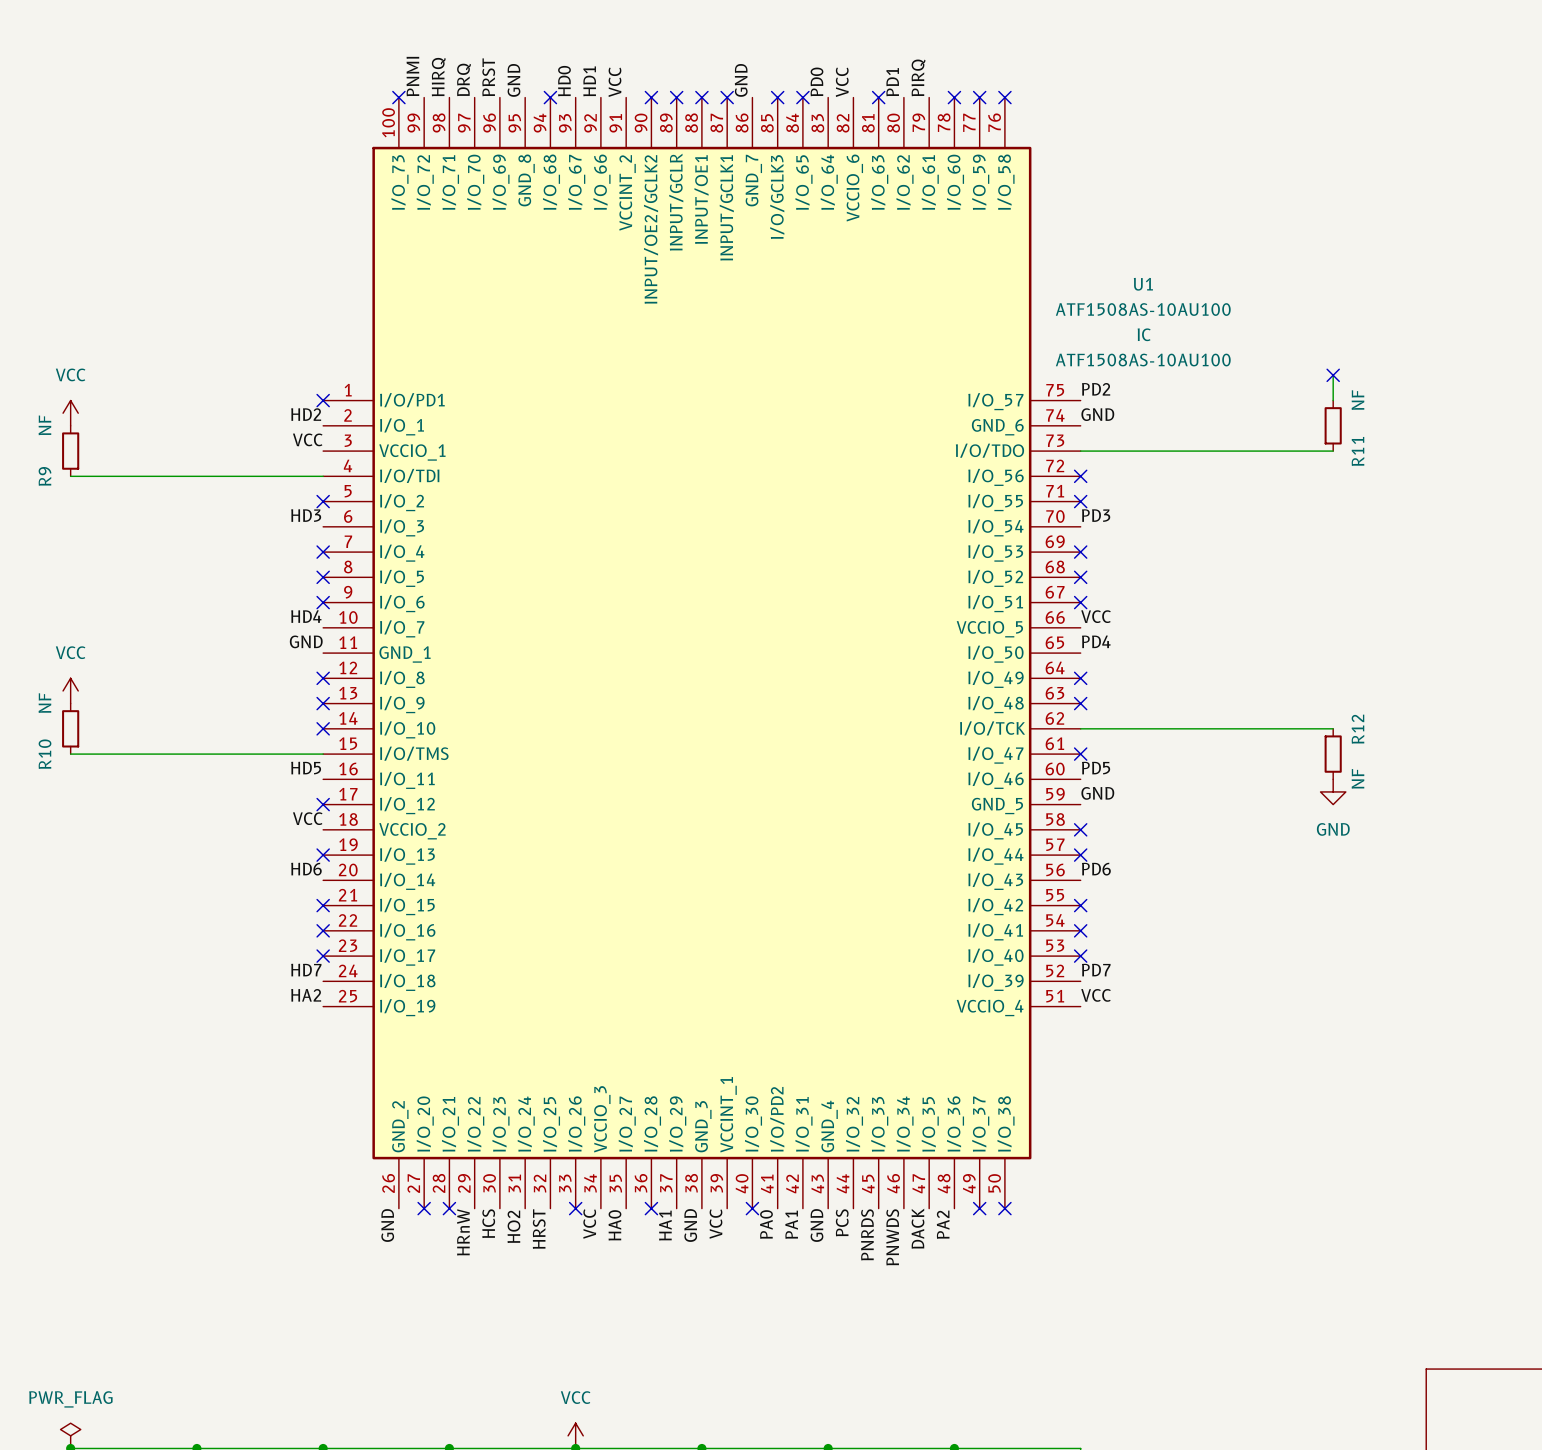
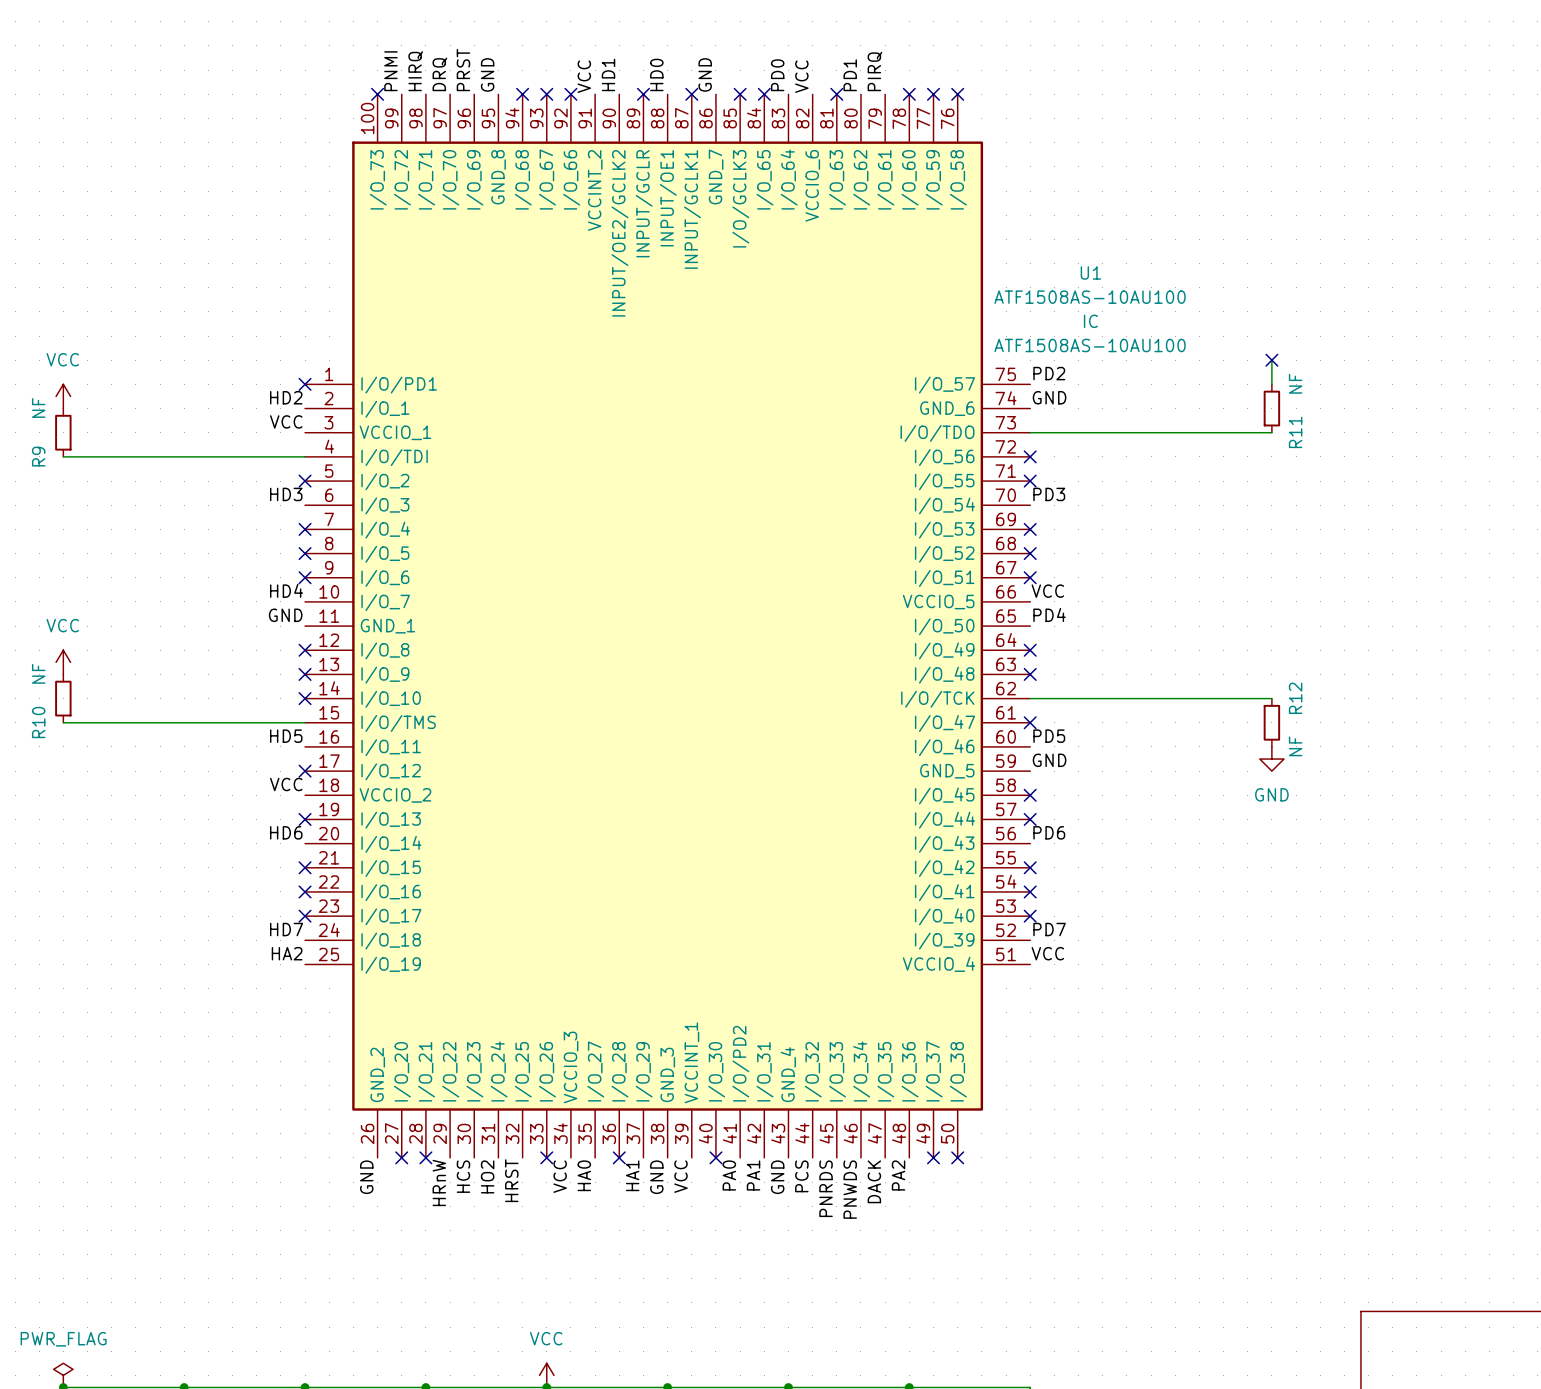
label position: HD0 (564, 81) -> HD0 (656, 74)
label position: HD1 (589, 81) -> HD1 (608, 74)
no-connect mark: none -> (546, 94)
no-connect mark: none -> (570, 94)
no-connect mark: (651, 97) -> none
no-connect mark: (701, 97) -> none

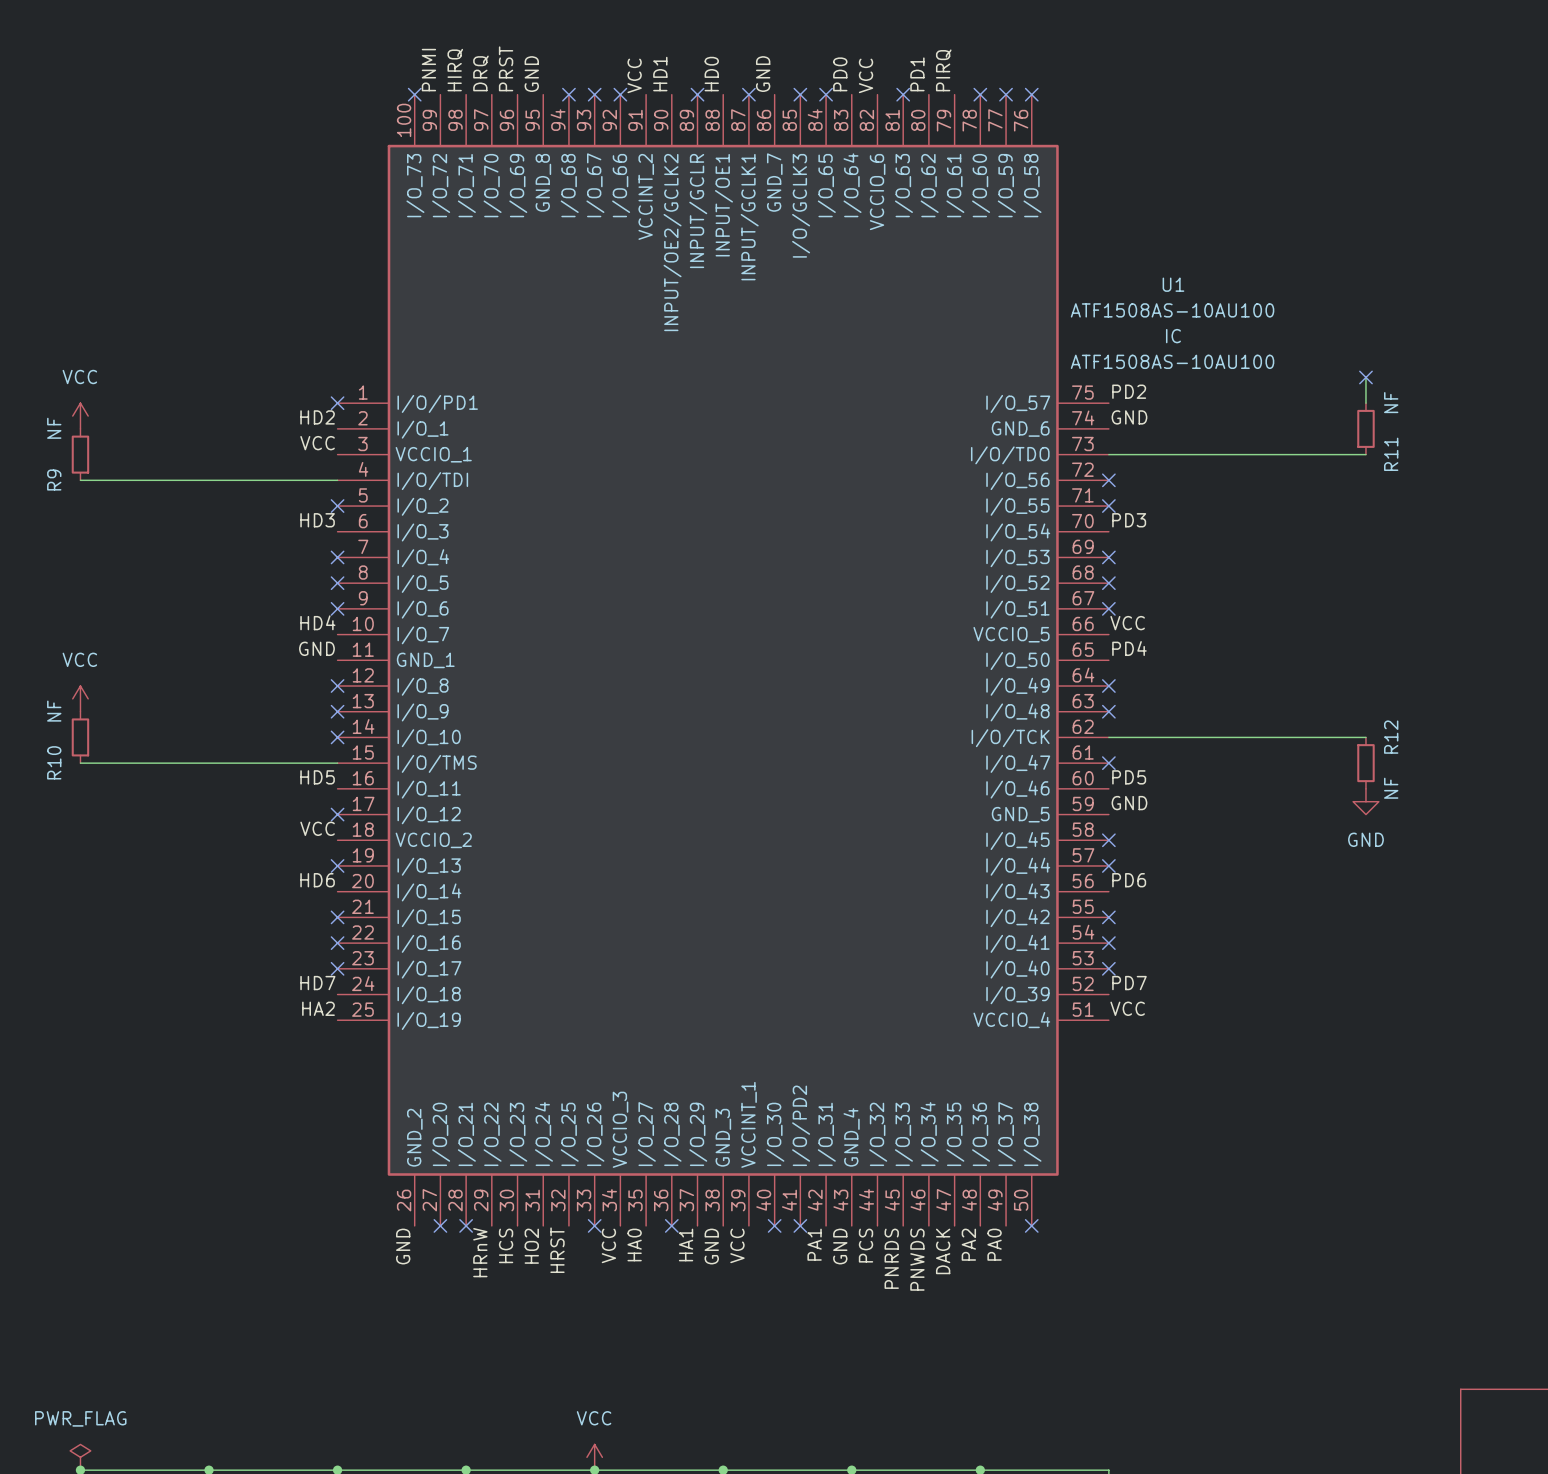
no-connect mark: none -> (800, 1225)
no-connect mark: (933, 1157) -> none
label position: PA0 (729, 1175) -> PA0 (994, 1244)

